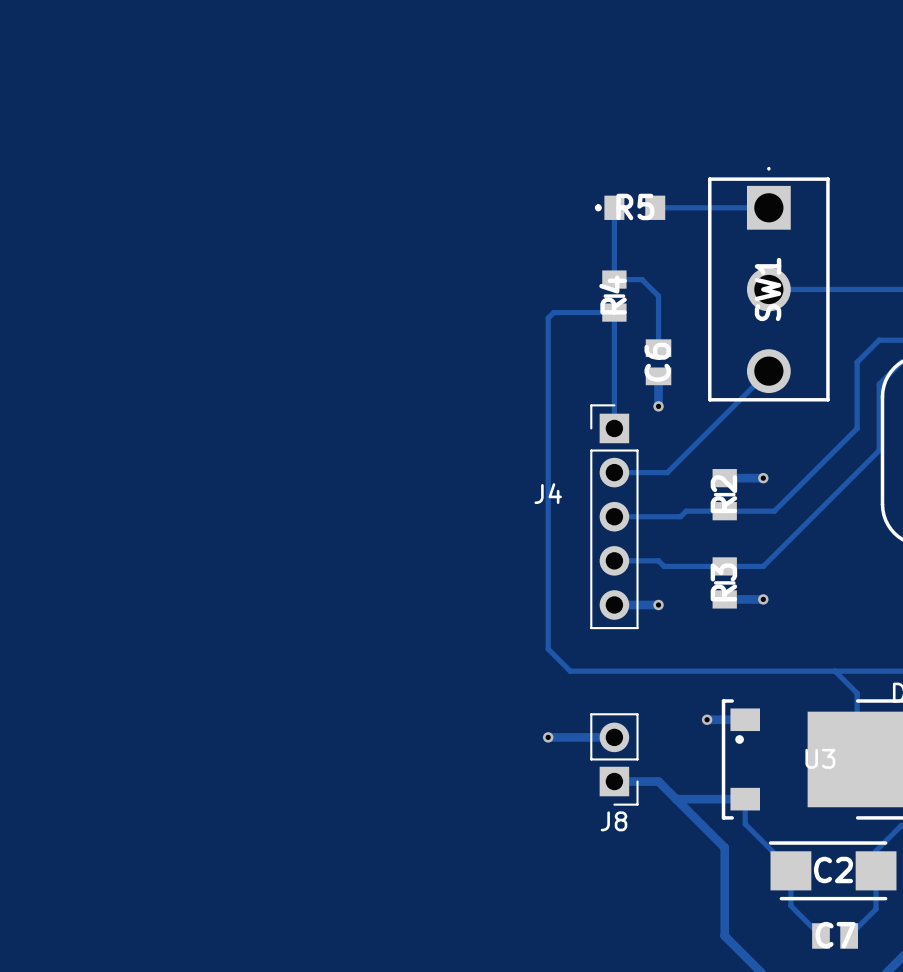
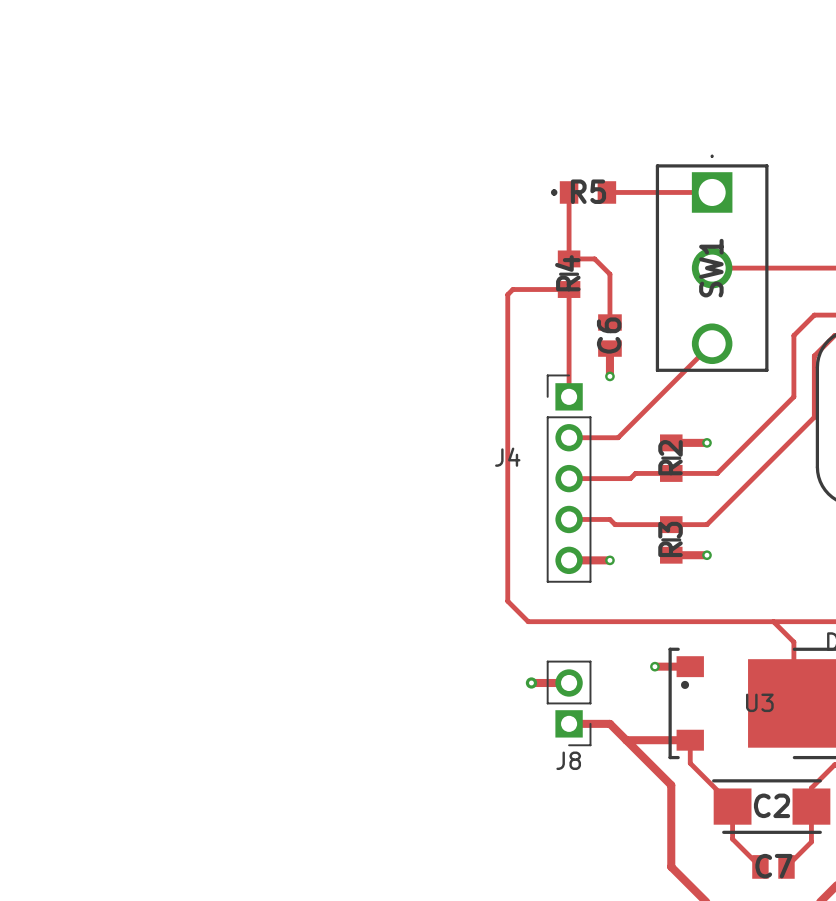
track: (548, 737) (573, 737) -> none
via: (548, 737) -> none
via: none -> (531, 682)

